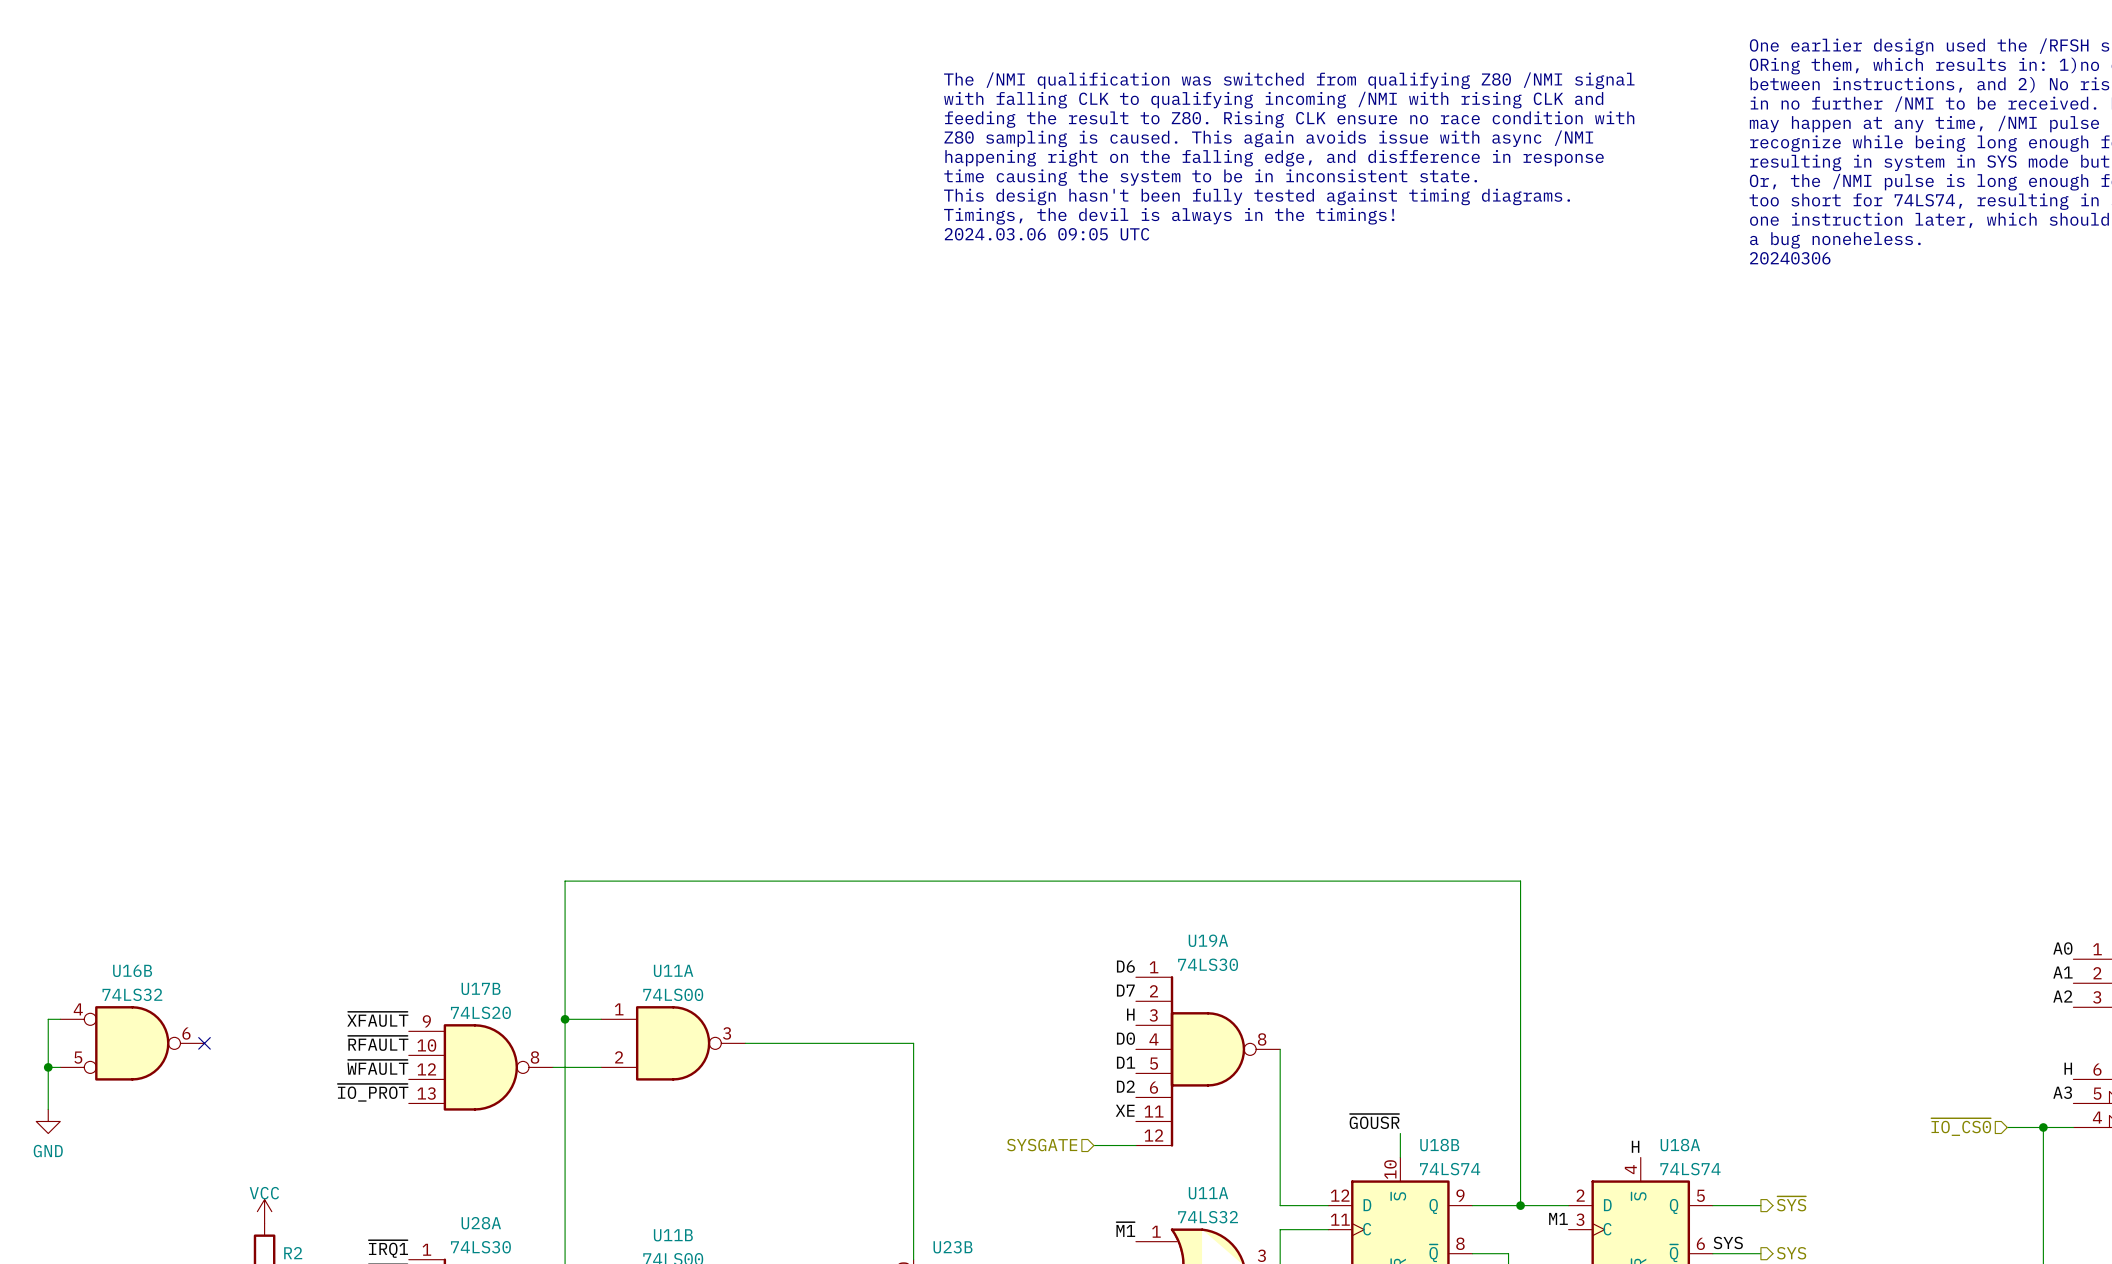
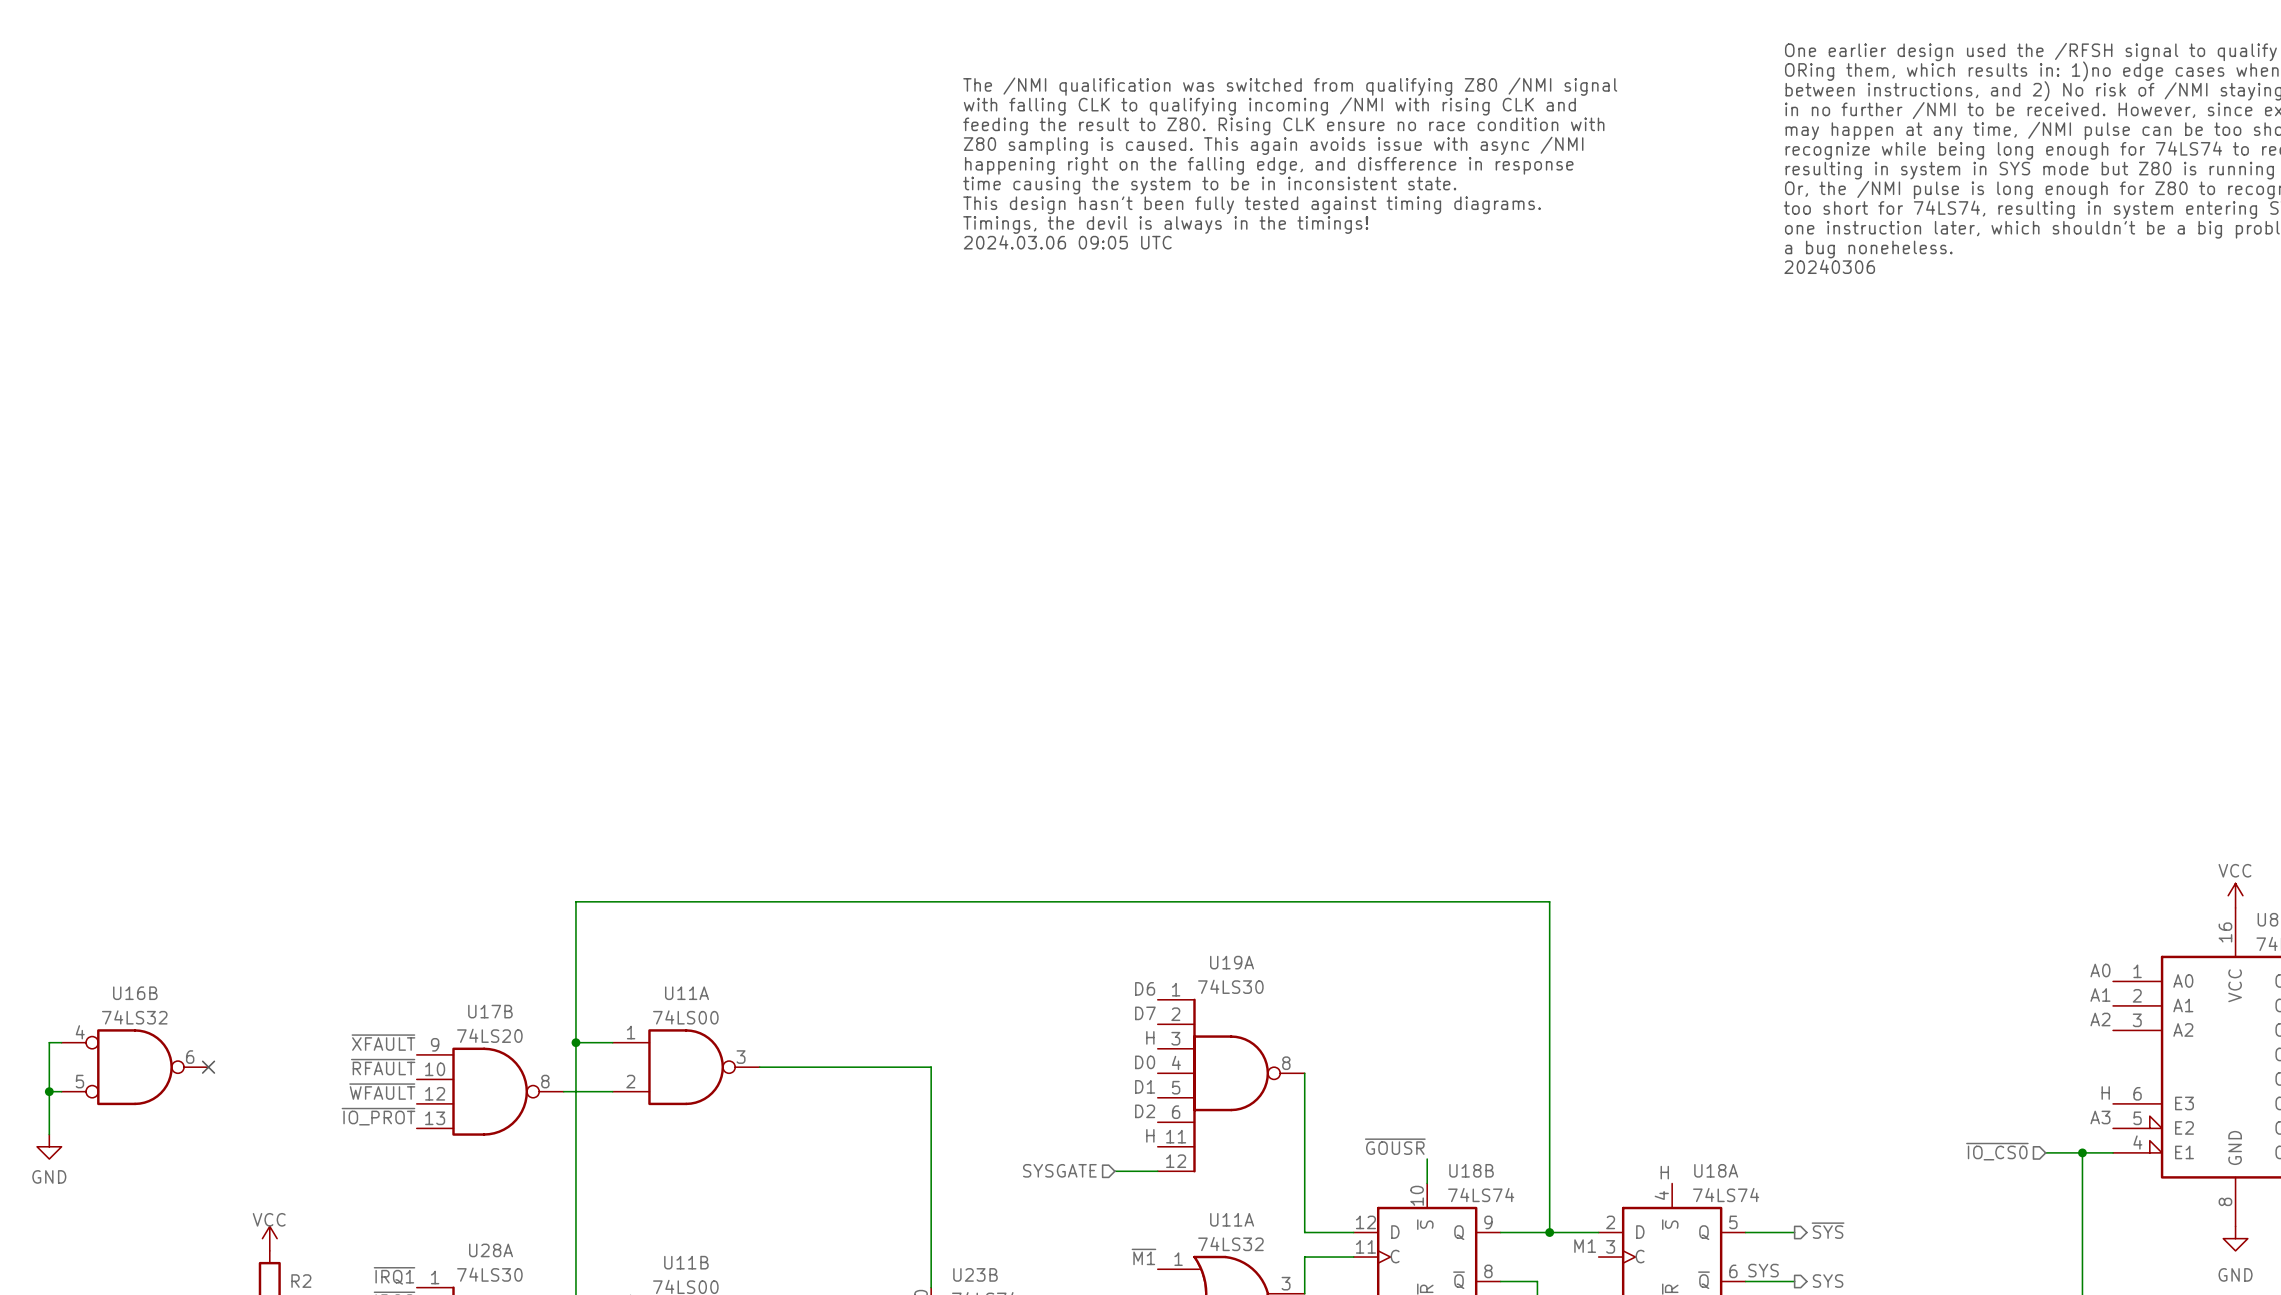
label: XE (1125, 1110) -> H (1150, 1135)

